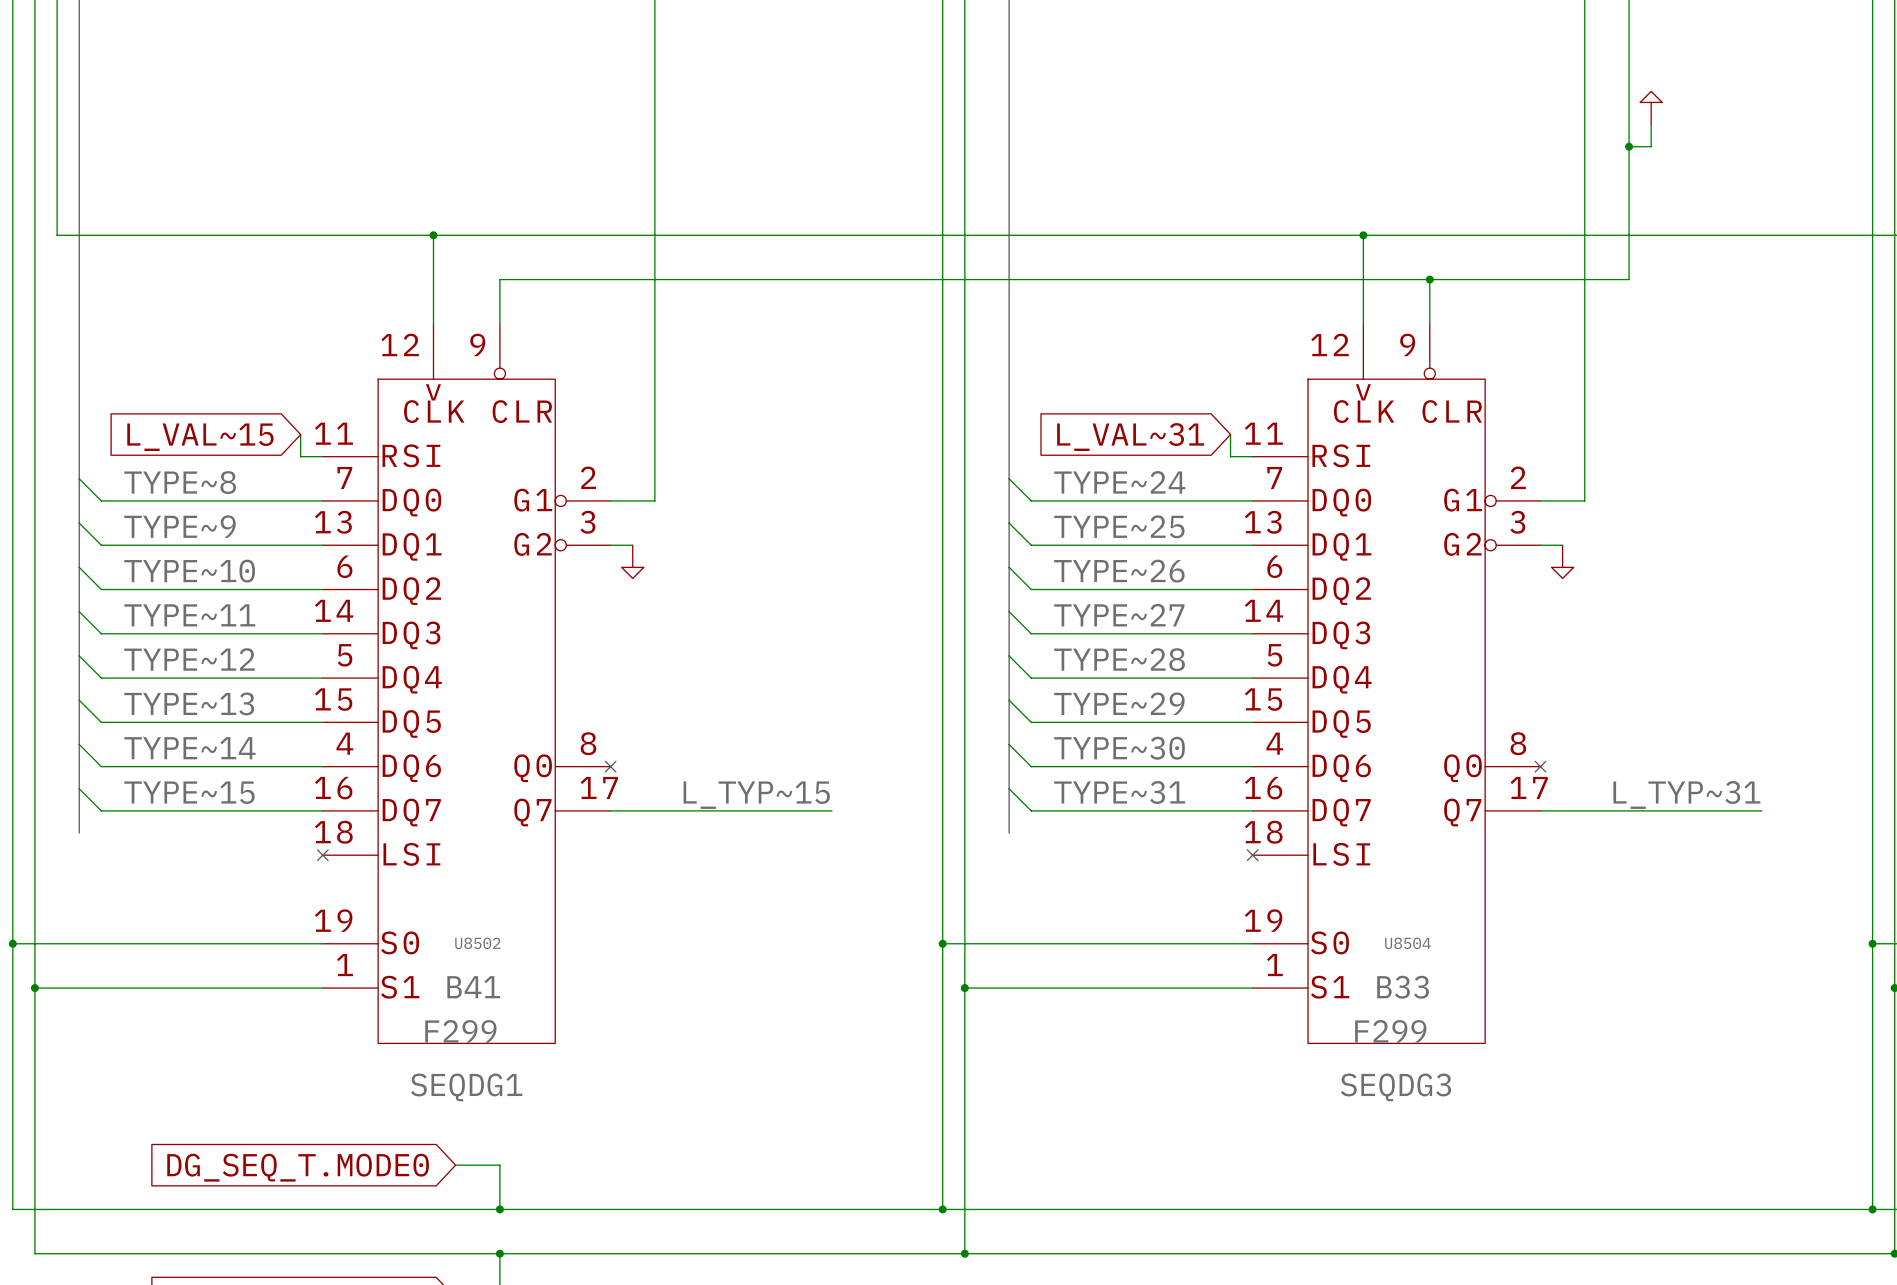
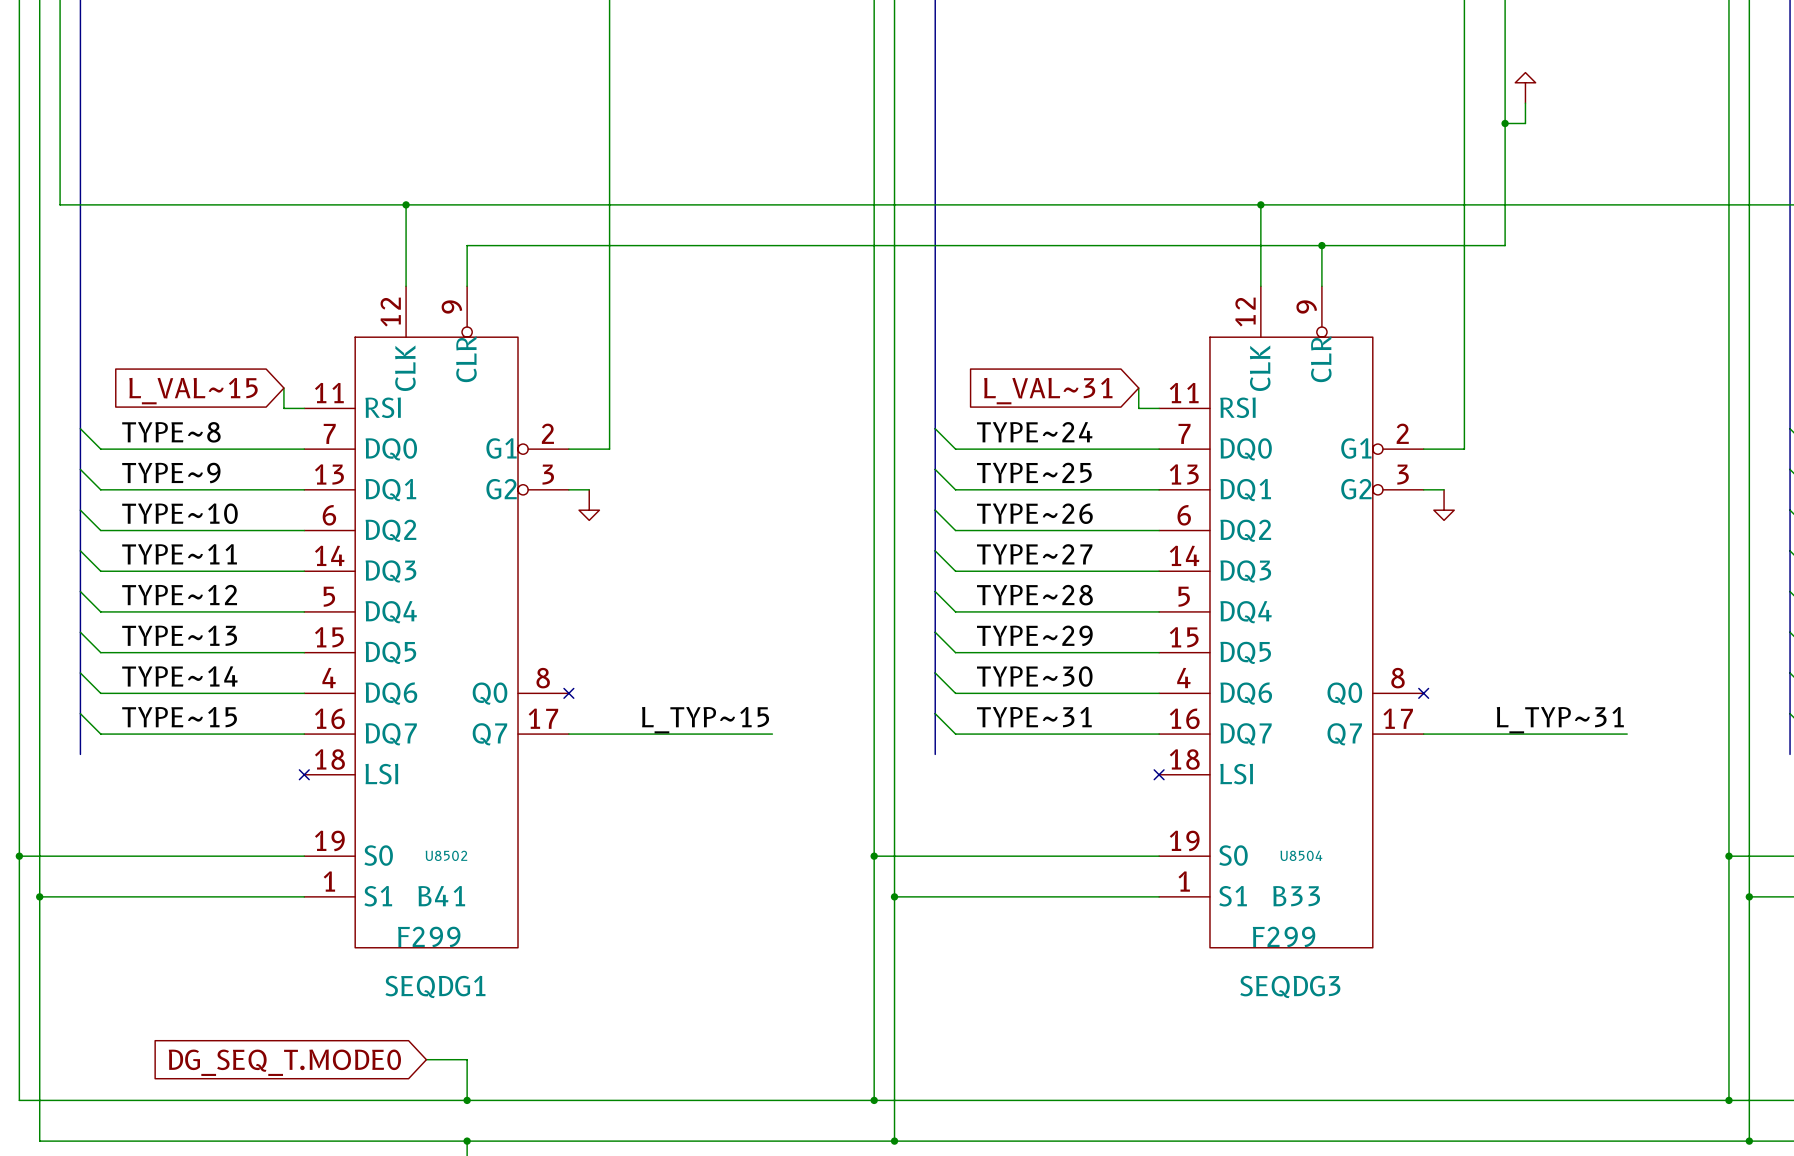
U8502 symbol: [322, 323, 611, 1044] -> [304, 286, 569, 948]
U8504 symbol: [1252, 323, 1541, 1044] -> [1159, 286, 1424, 948]

